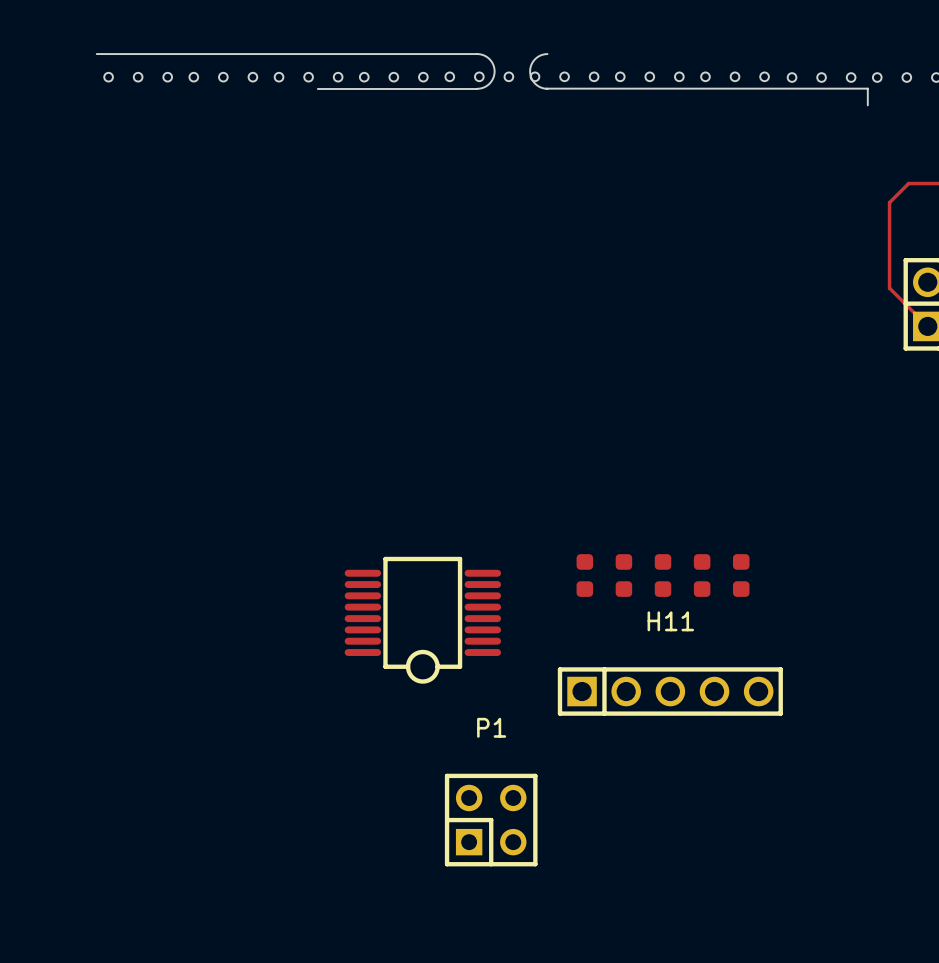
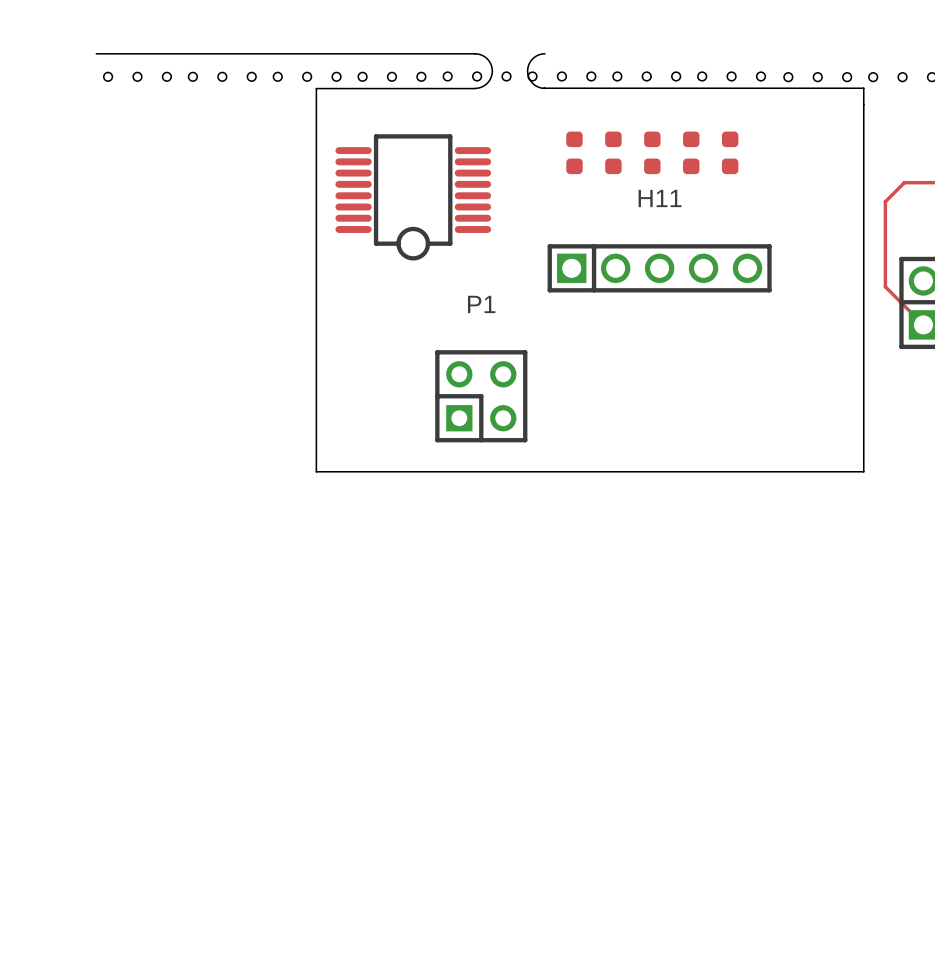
board edge: none -> (316, 88) (316, 471) (863, 471) (863, 104)
part: none -> (574, 152)
part: none -> (613, 152)
part: none -> (652, 152)
part: none -> (691, 152)
part: none -> (730, 152)
part: (584, 575) -> none
part: (623, 575) -> none
part: (663, 575) -> none
part: (702, 575) -> none
part: (741, 575) -> none
part position: (422, 620) -> (413, 197)
H11 position: (670, 691) -> (659, 268)
P1 position: (491, 820) -> (481, 396)

